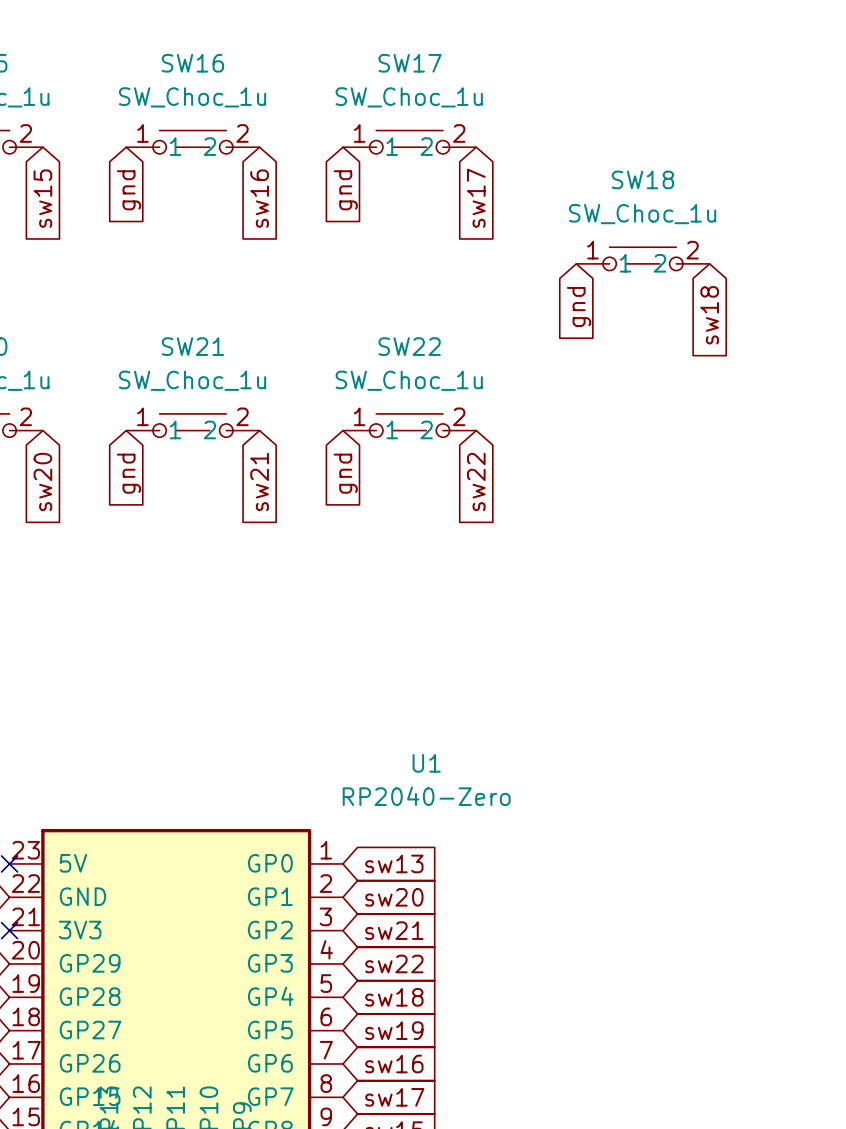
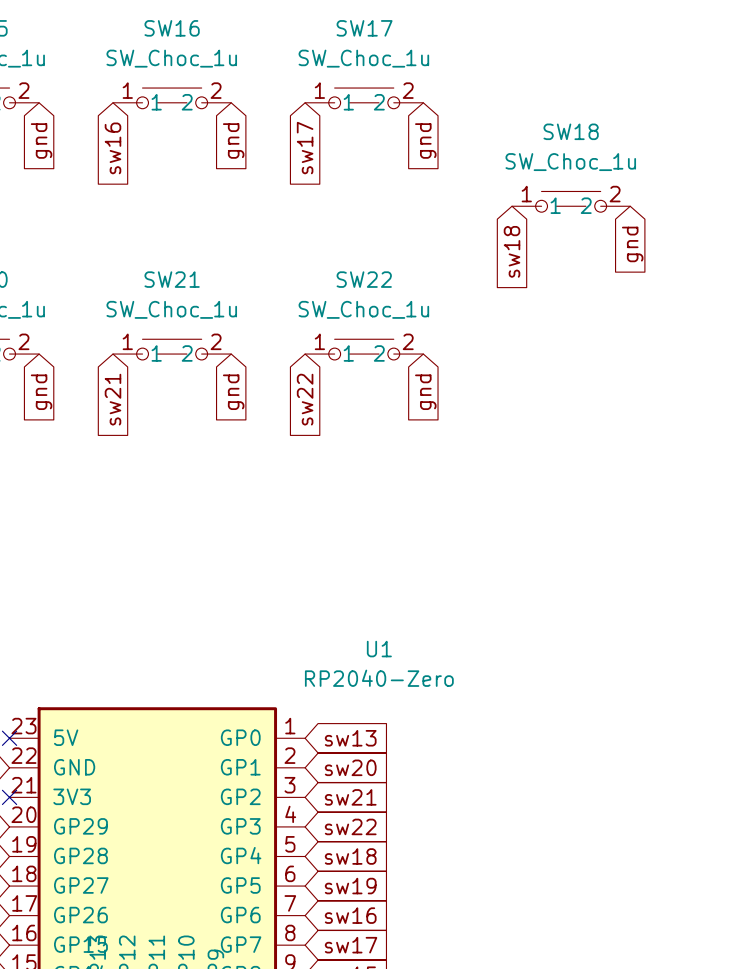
global label: gnd (129, 190) -> sw16 (112, 148)
global label: gnd (345, 190) -> sw17 (305, 148)
global label: sw15 (42, 198) -> gnd (41, 141)
global label: sw16 (259, 198) -> gnd (233, 141)
global label: sw17 (476, 198) -> gnd (425, 141)
global label: gnd (579, 306) -> sw18 (512, 251)
global label: sw18 (709, 315) -> gnd (632, 244)
global label: gnd (129, 473) -> sw21 (112, 399)
global label: gnd (345, 473) -> sw22 (305, 399)
global label: sw20 (42, 482) -> gnd (41, 392)
global label: sw21 (259, 482) -> gnd (233, 392)
global label: sw22 (476, 482) -> gnd (425, 392)

